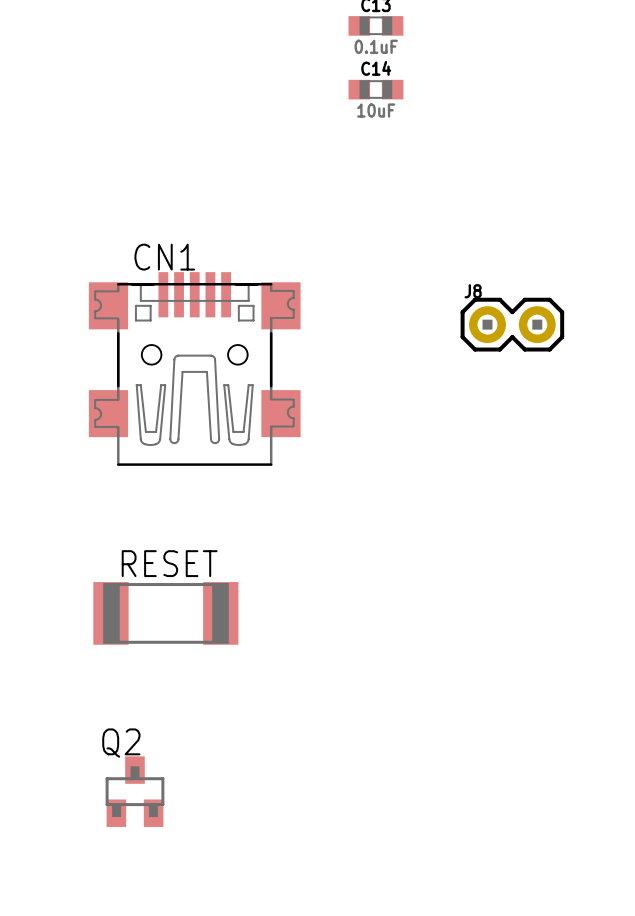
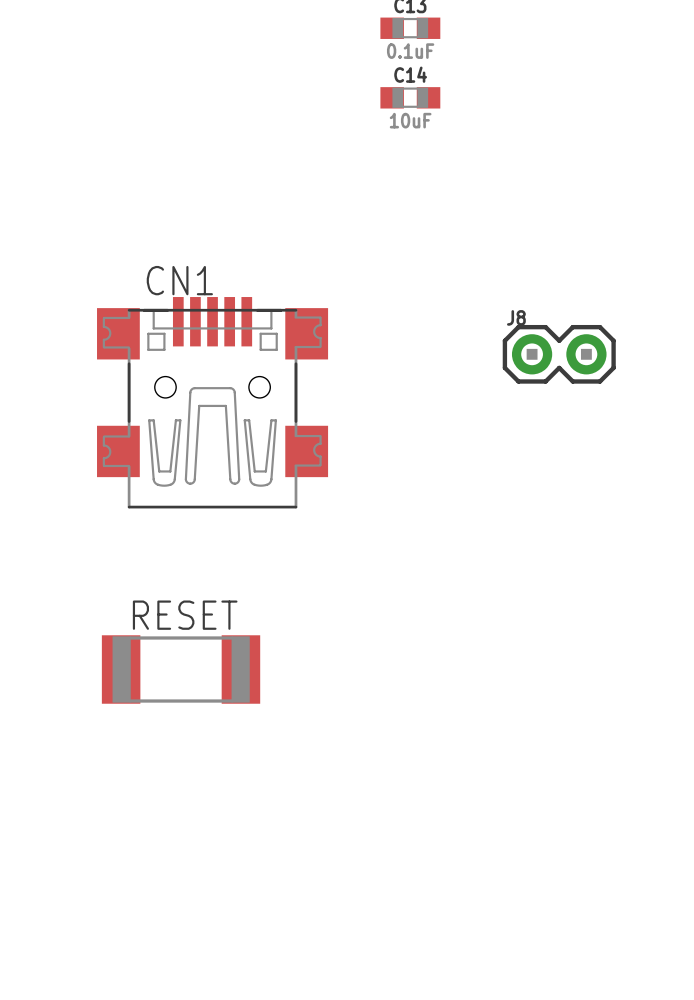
Q2: (134, 791) -> none

